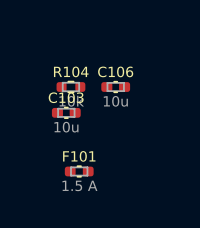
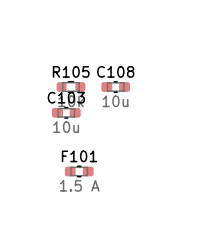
R104 name: R104 (71, 71) -> R105 (71, 71)
C106 name: C106 (115, 71) -> C108 (115, 71)

